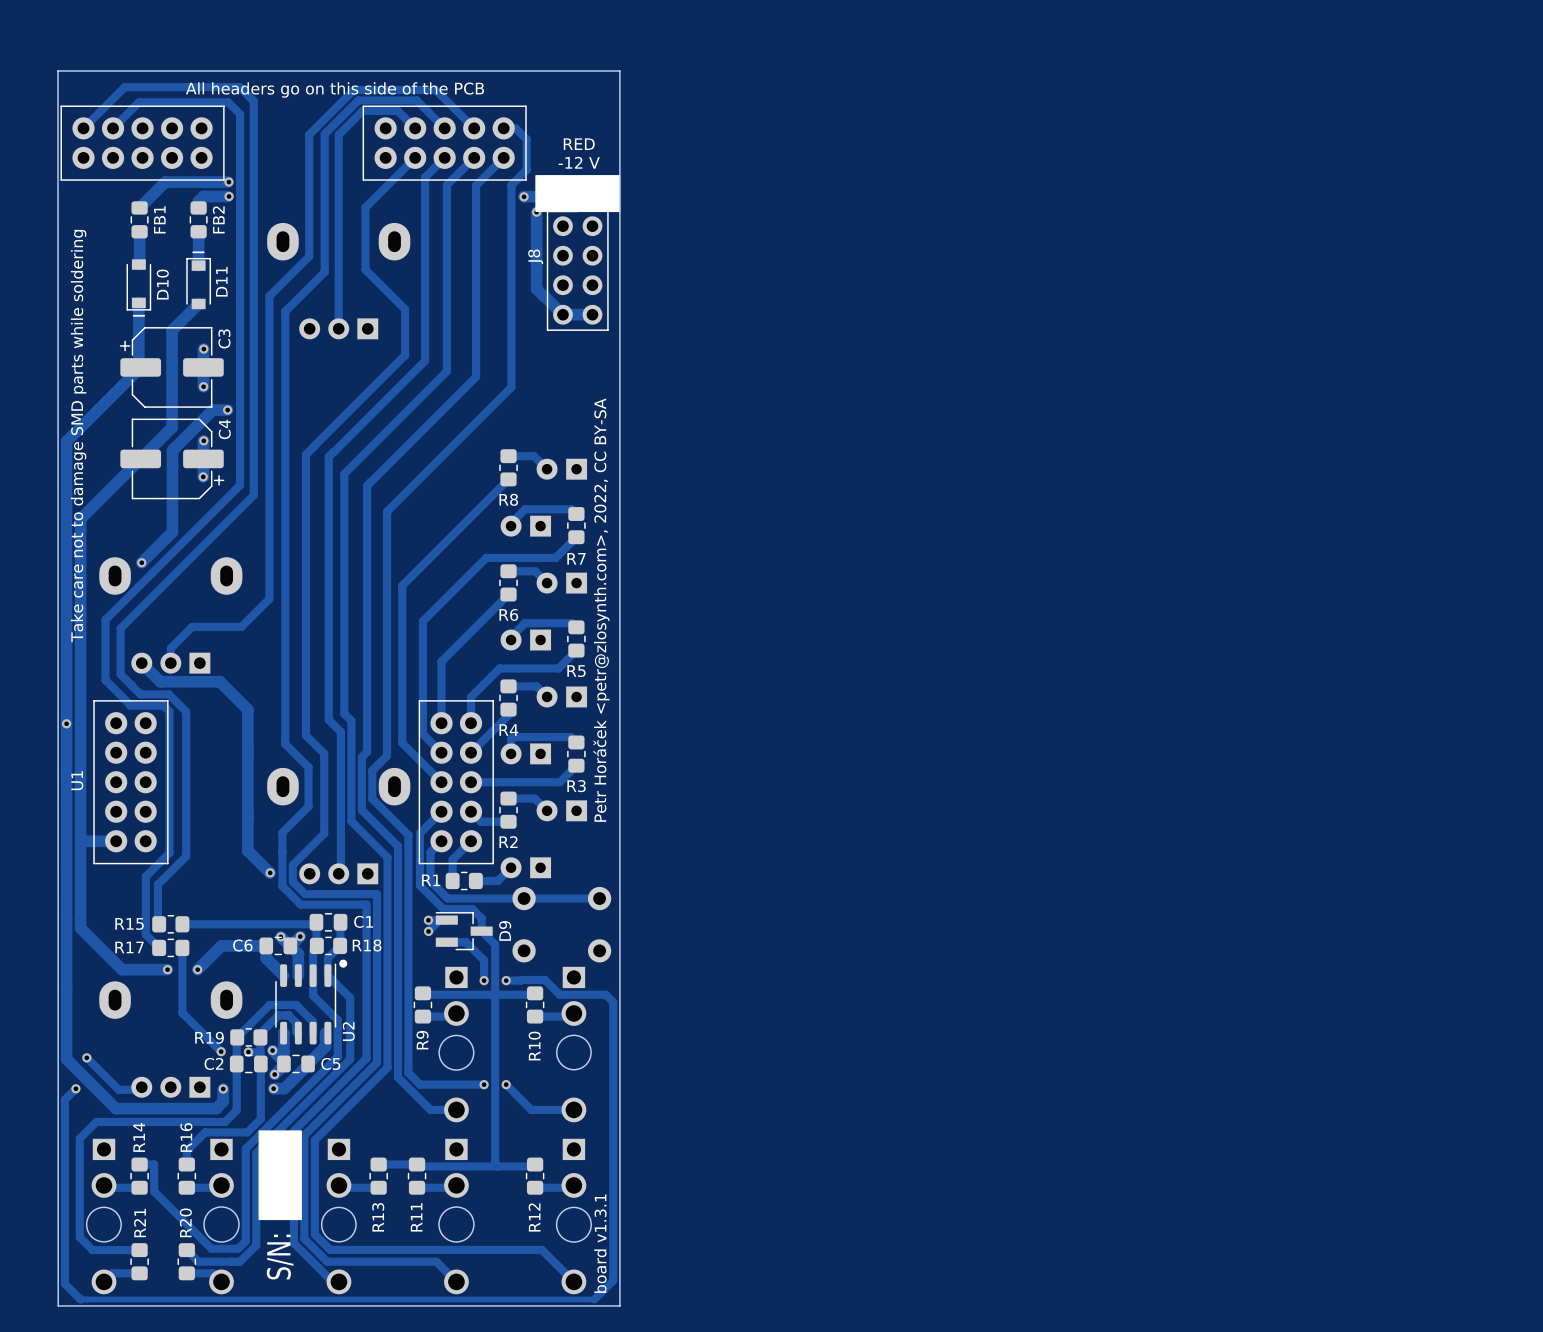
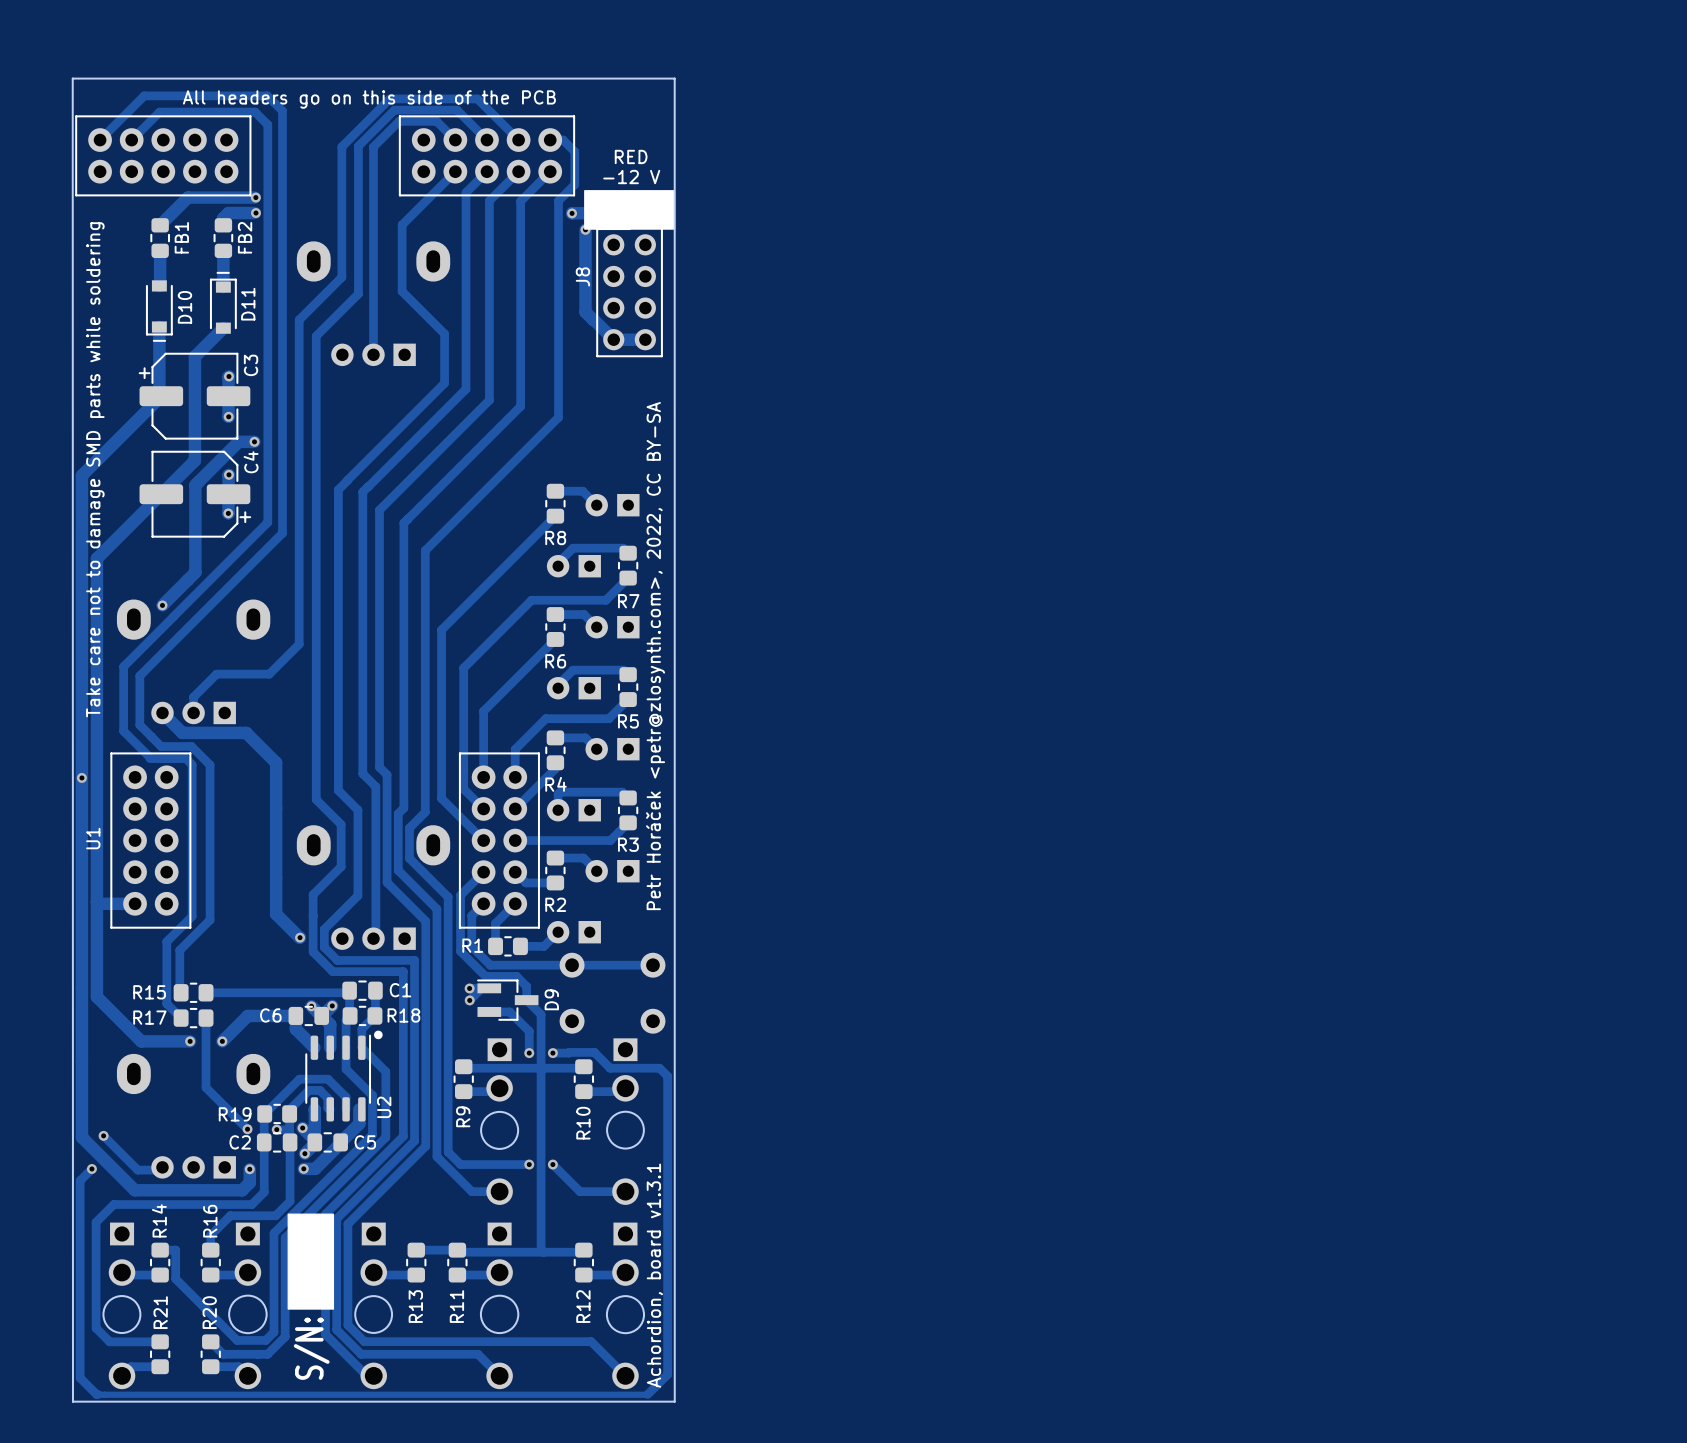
text: none -> board v1.3.1 (653, 1221)
text: board v1.3.1 (600, 1243) -> Achordion, (654, 1339)

